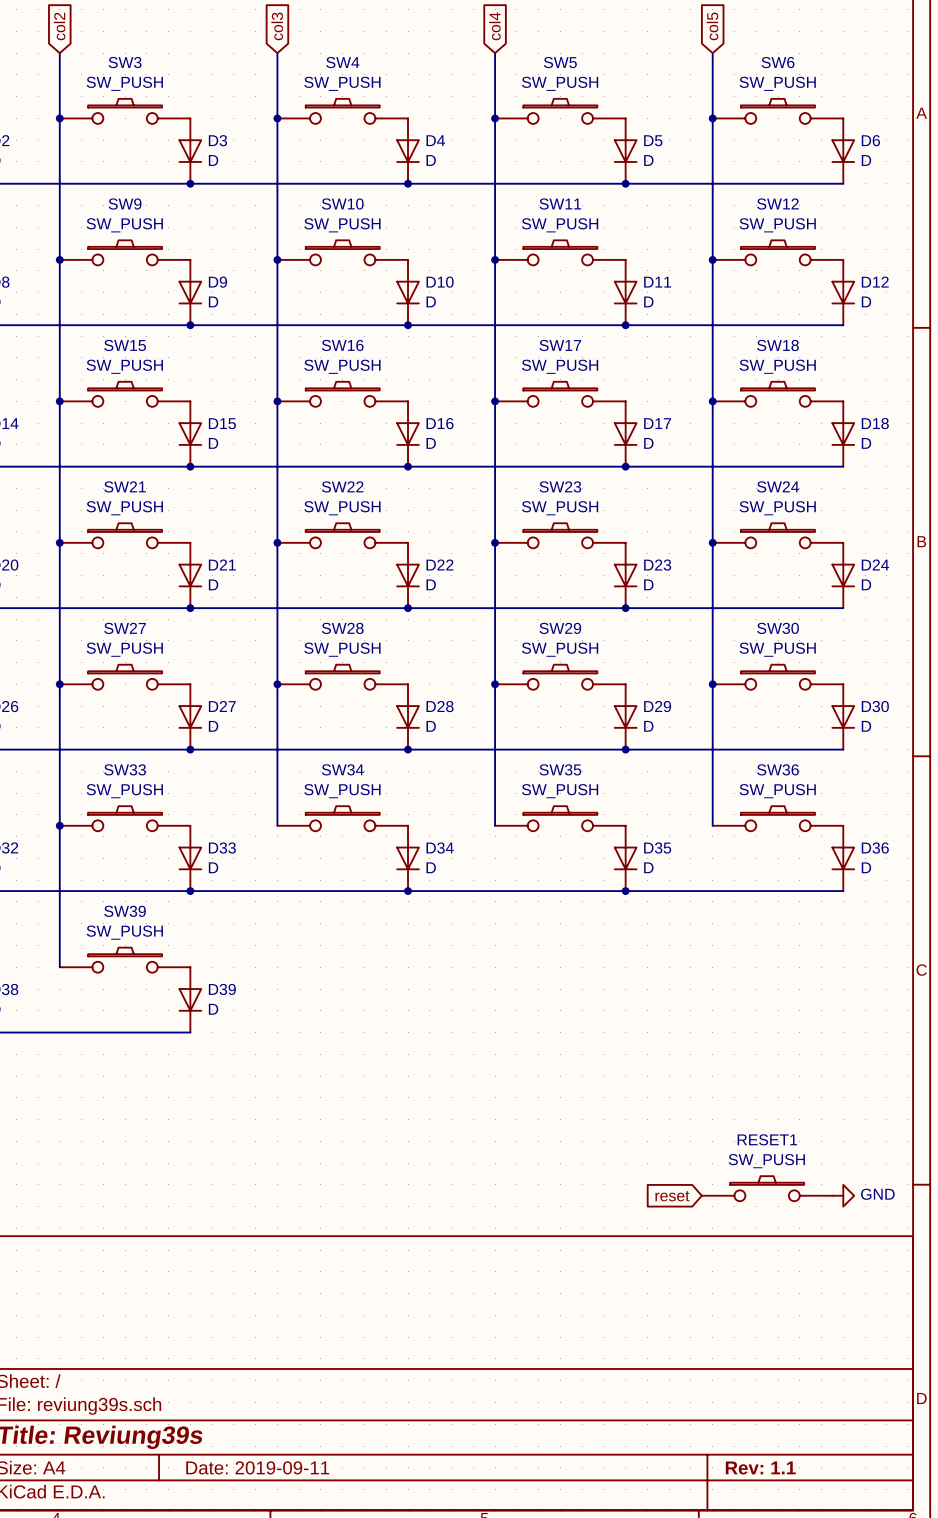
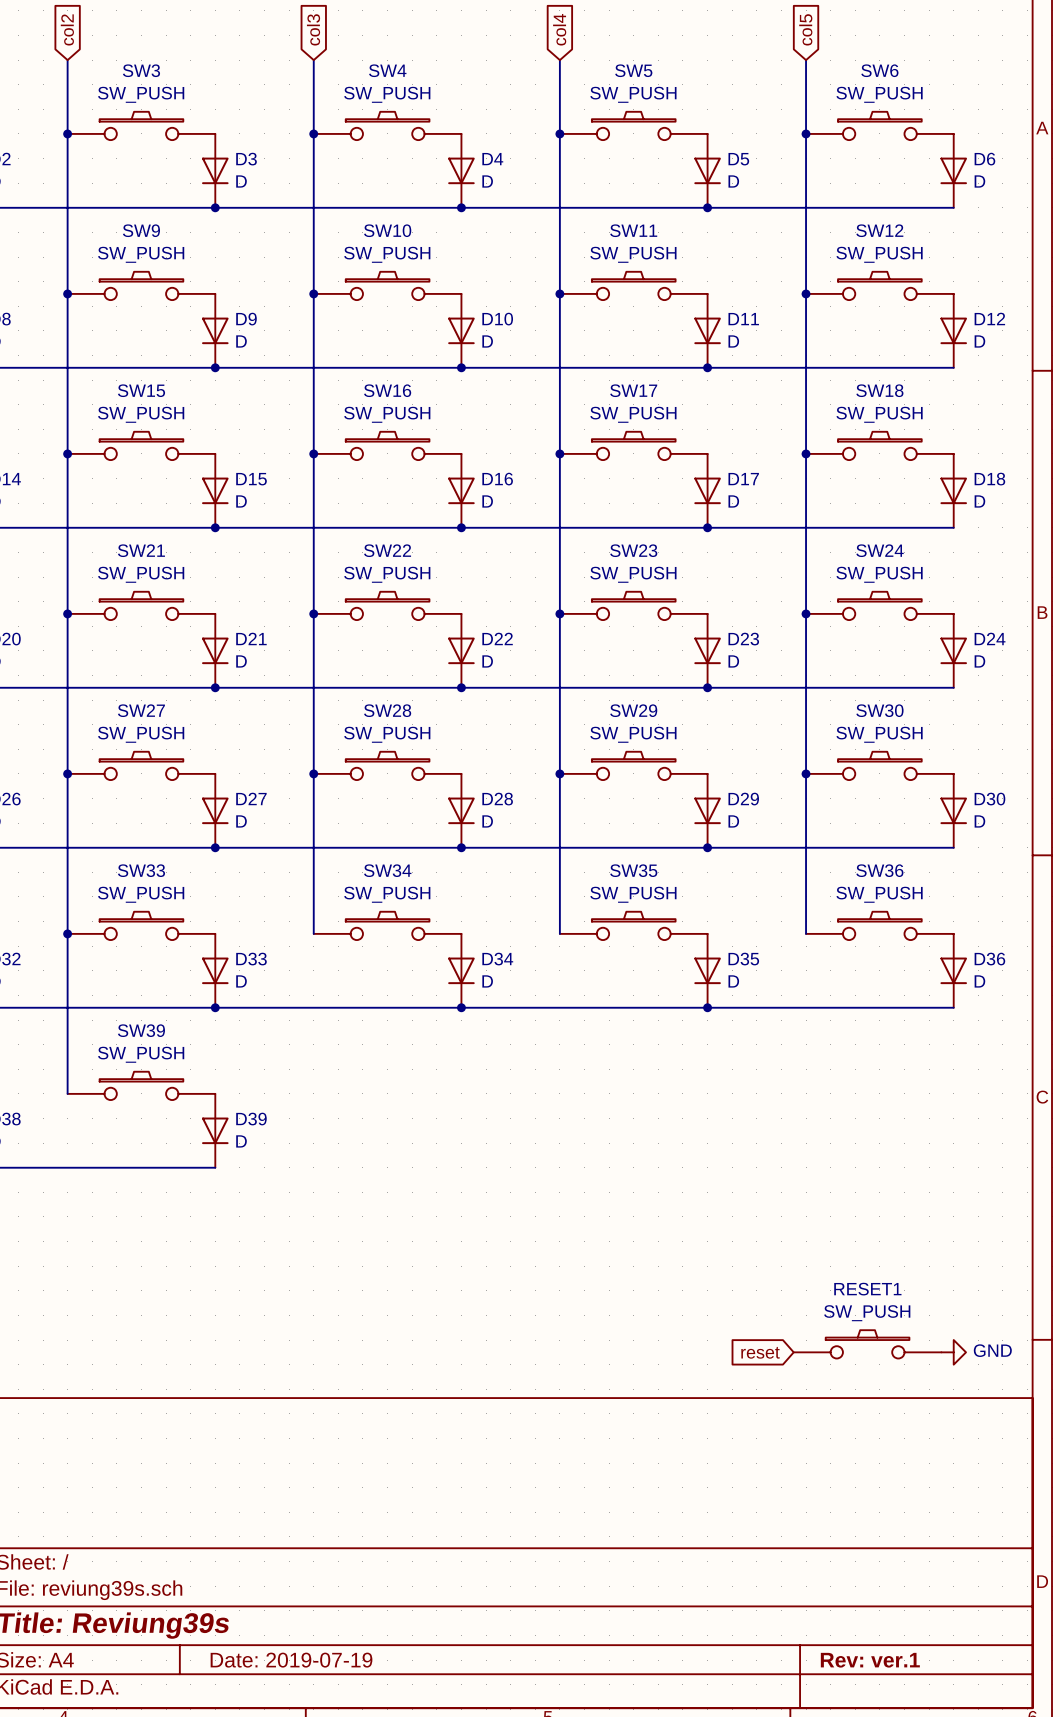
title block: Date: 2019-09-11 (257, 1467) -> Date: 2019-07-19 (291, 1660)
title block: Rev: 1.1 (760, 1468) -> Rev: ver.1 (870, 1660)

